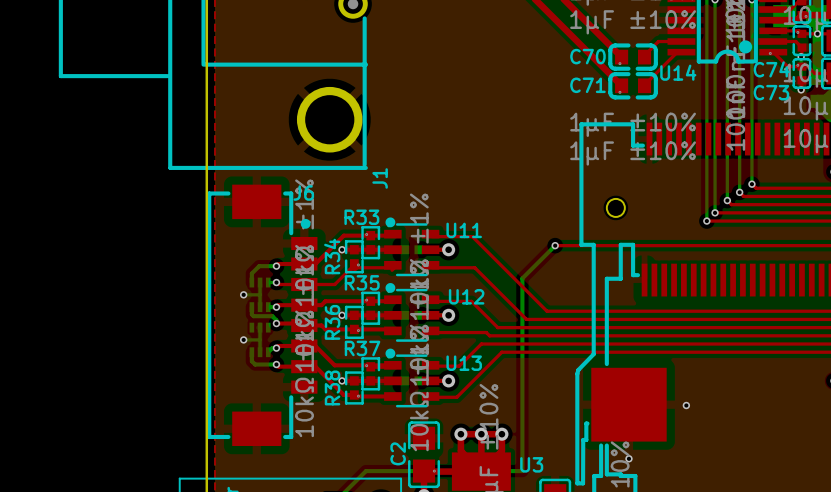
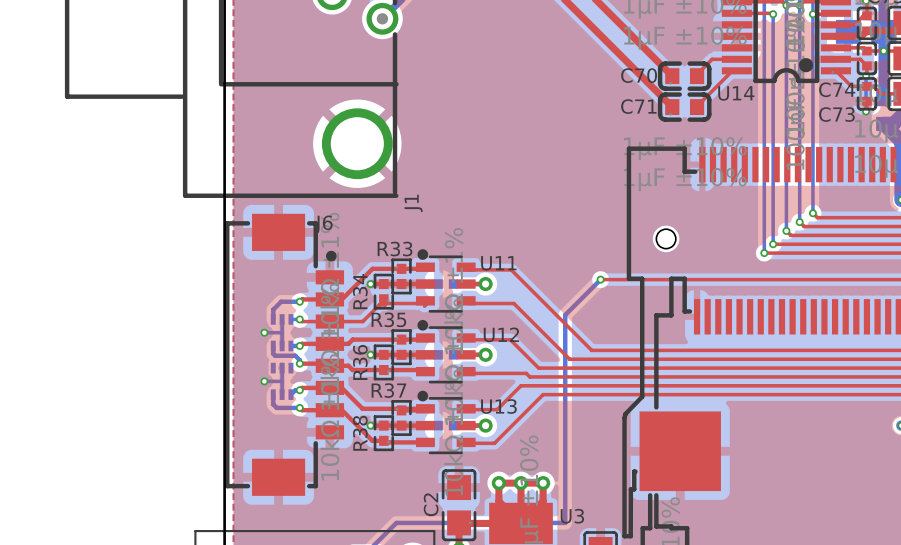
via: (686, 405) -> none
via: (628, 458) -> none

